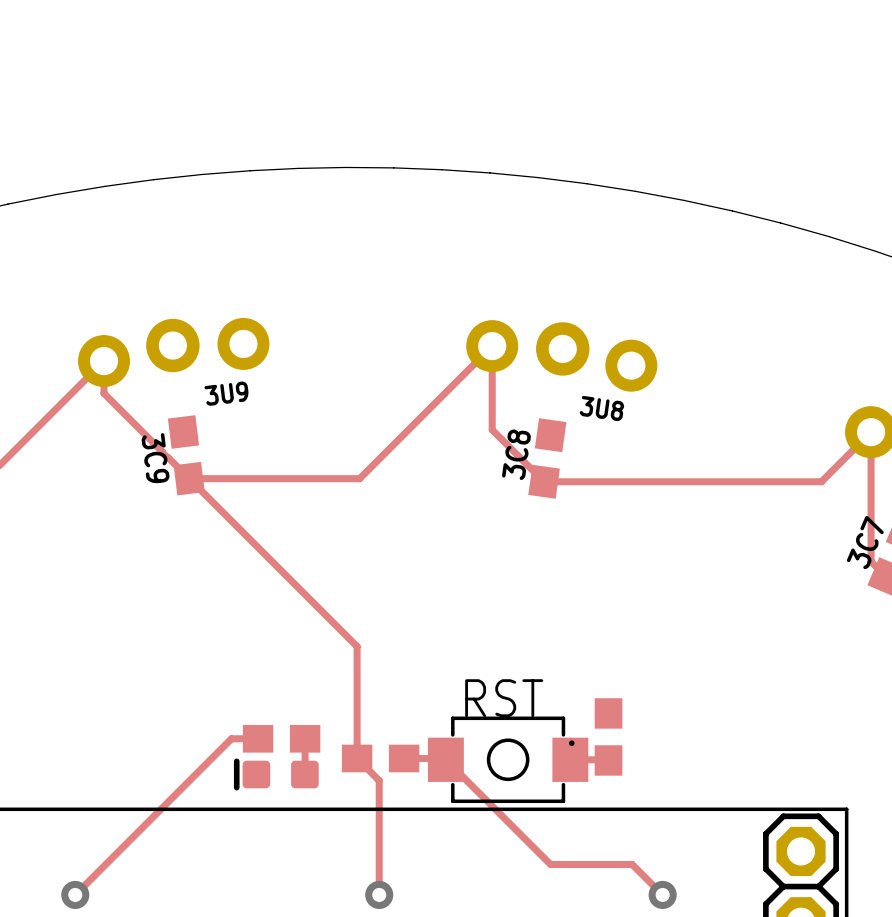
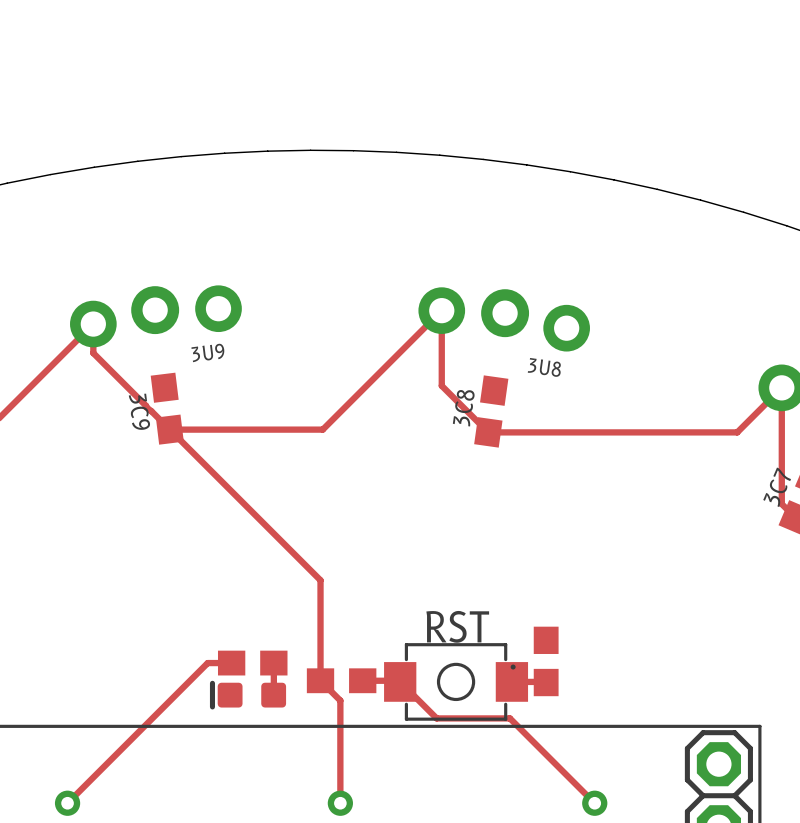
track: (486, 800) (550, 864) (632, 864) -> (436, 718) (509, 718) (567, 775)

